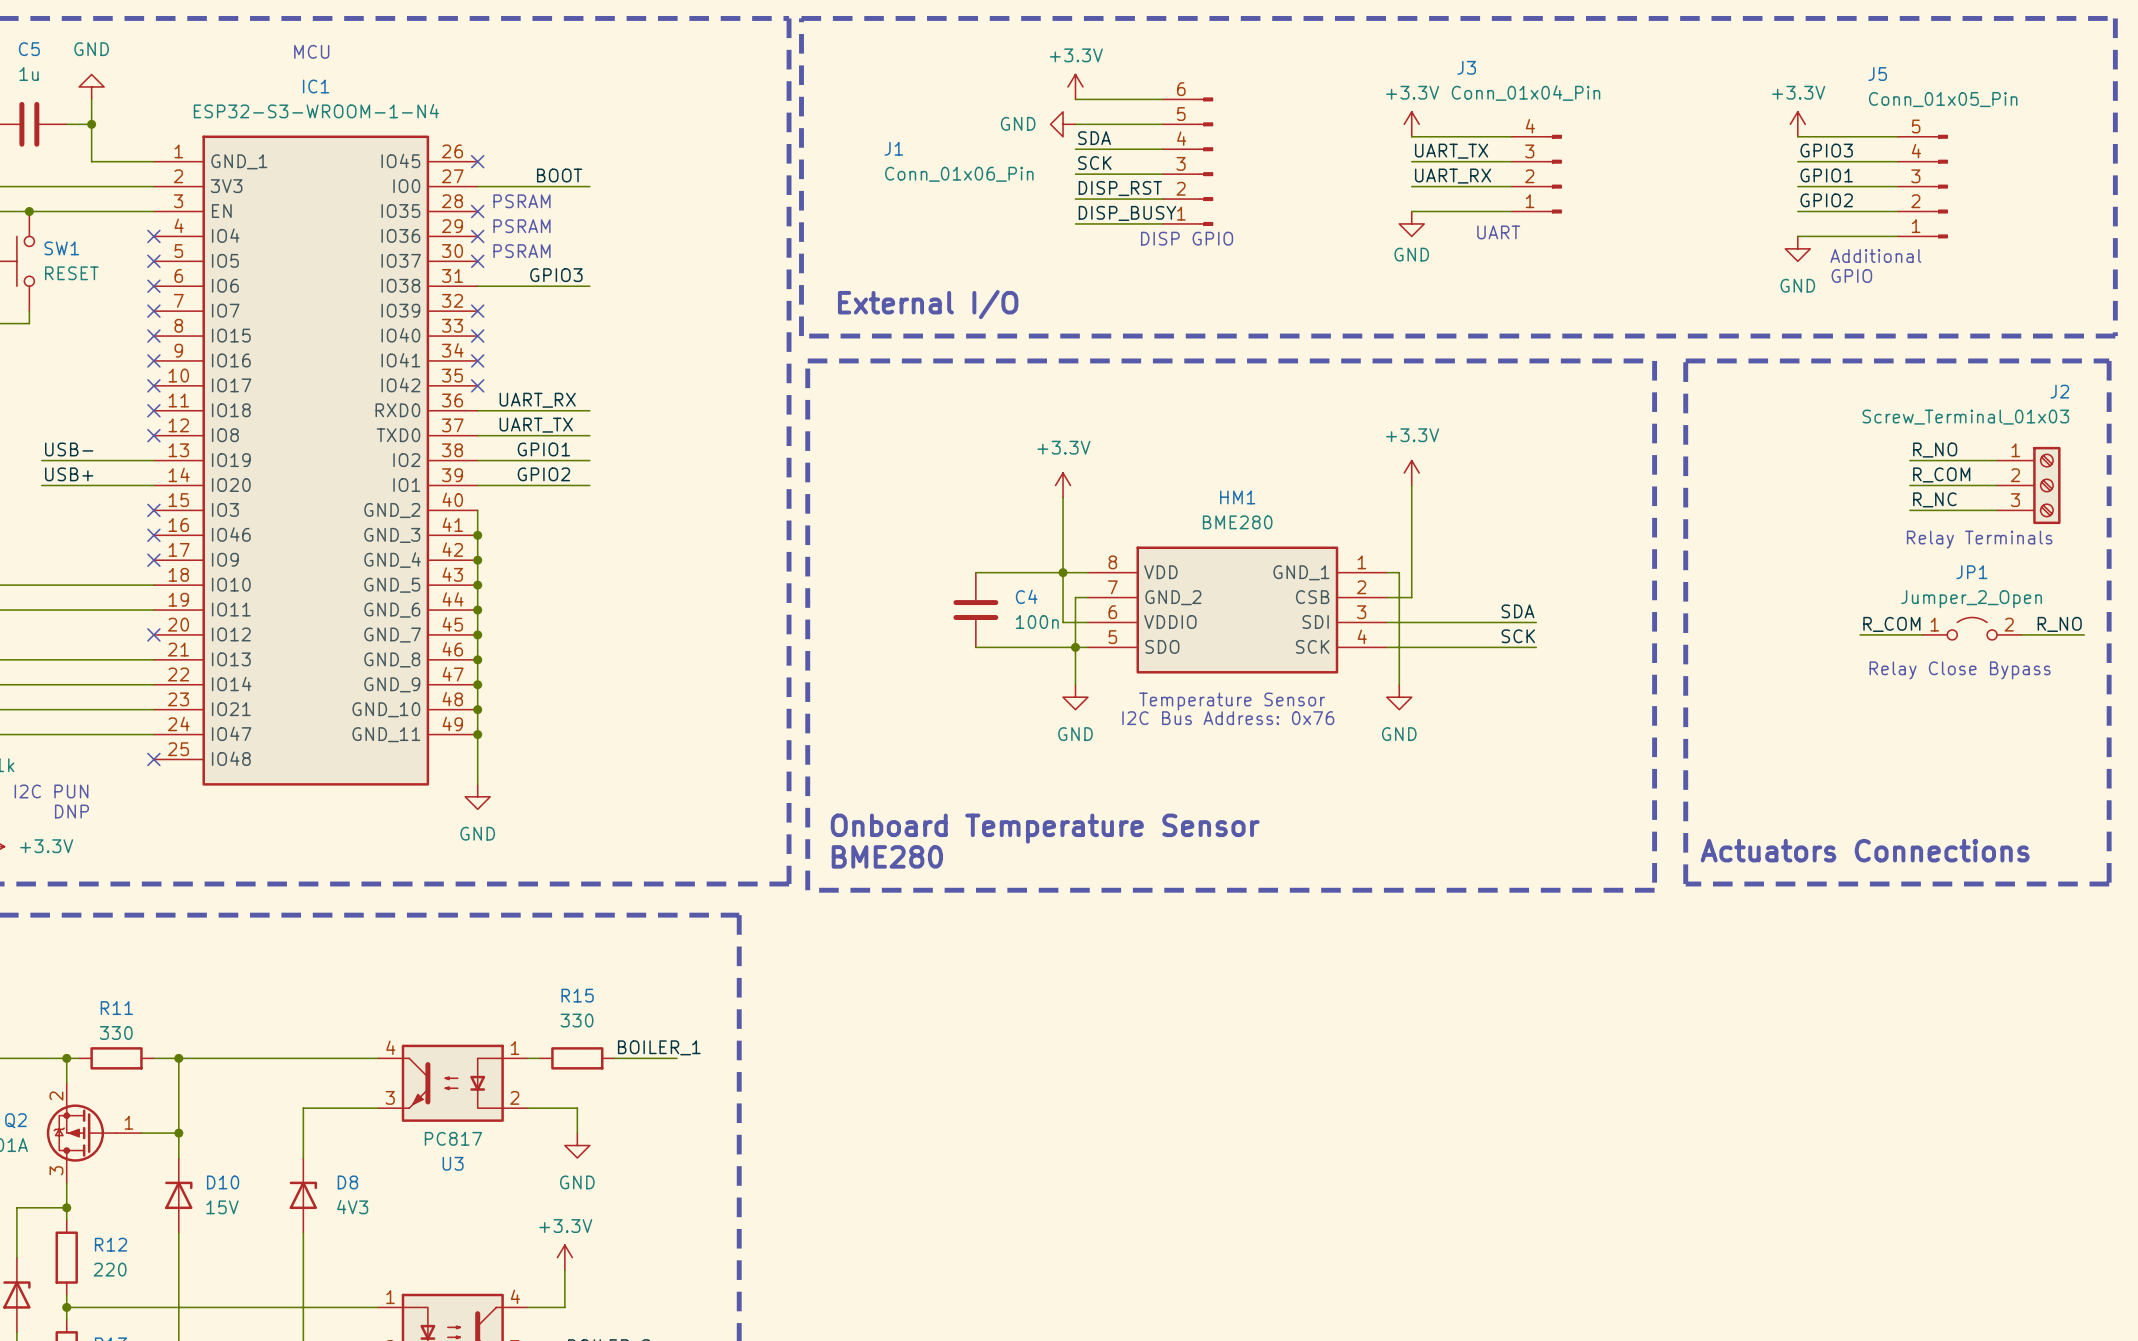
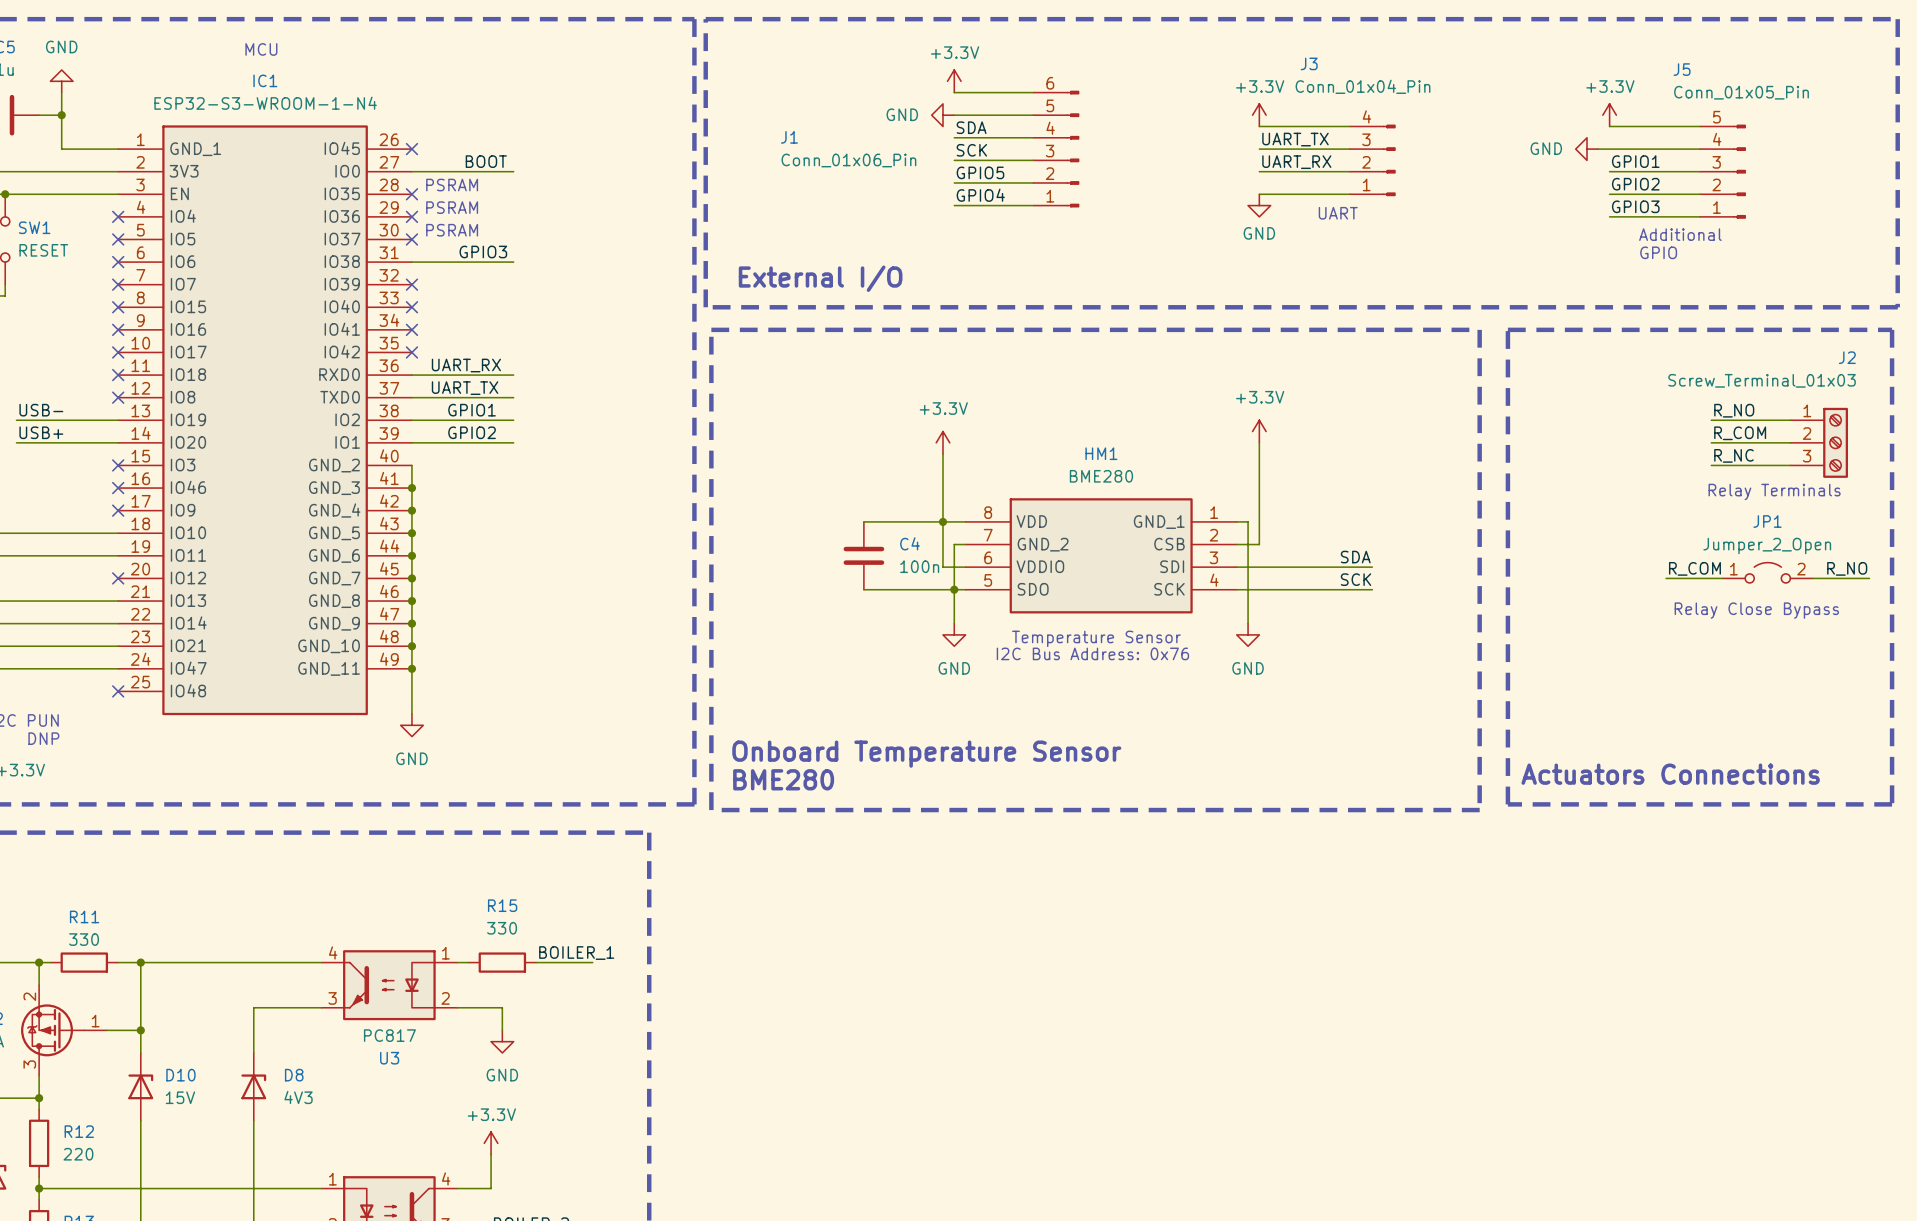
label position: GPIO3 (1826, 150) -> GPIO3 (1635, 206)
wire: none -> (1598, 149) (1609, 149)
label: DISP_RST (1120, 188) -> GPIO5 (980, 172)
label: DISP_BUSY (1127, 213) -> GPIO4 (980, 195)
text: DISP GPIO (1187, 238) -> none
power symbol rotation: 0° (1797, 248) -> 90° clockwise (1587, 149)
power symbol position: GND (1797, 248) -> GND (1587, 149)

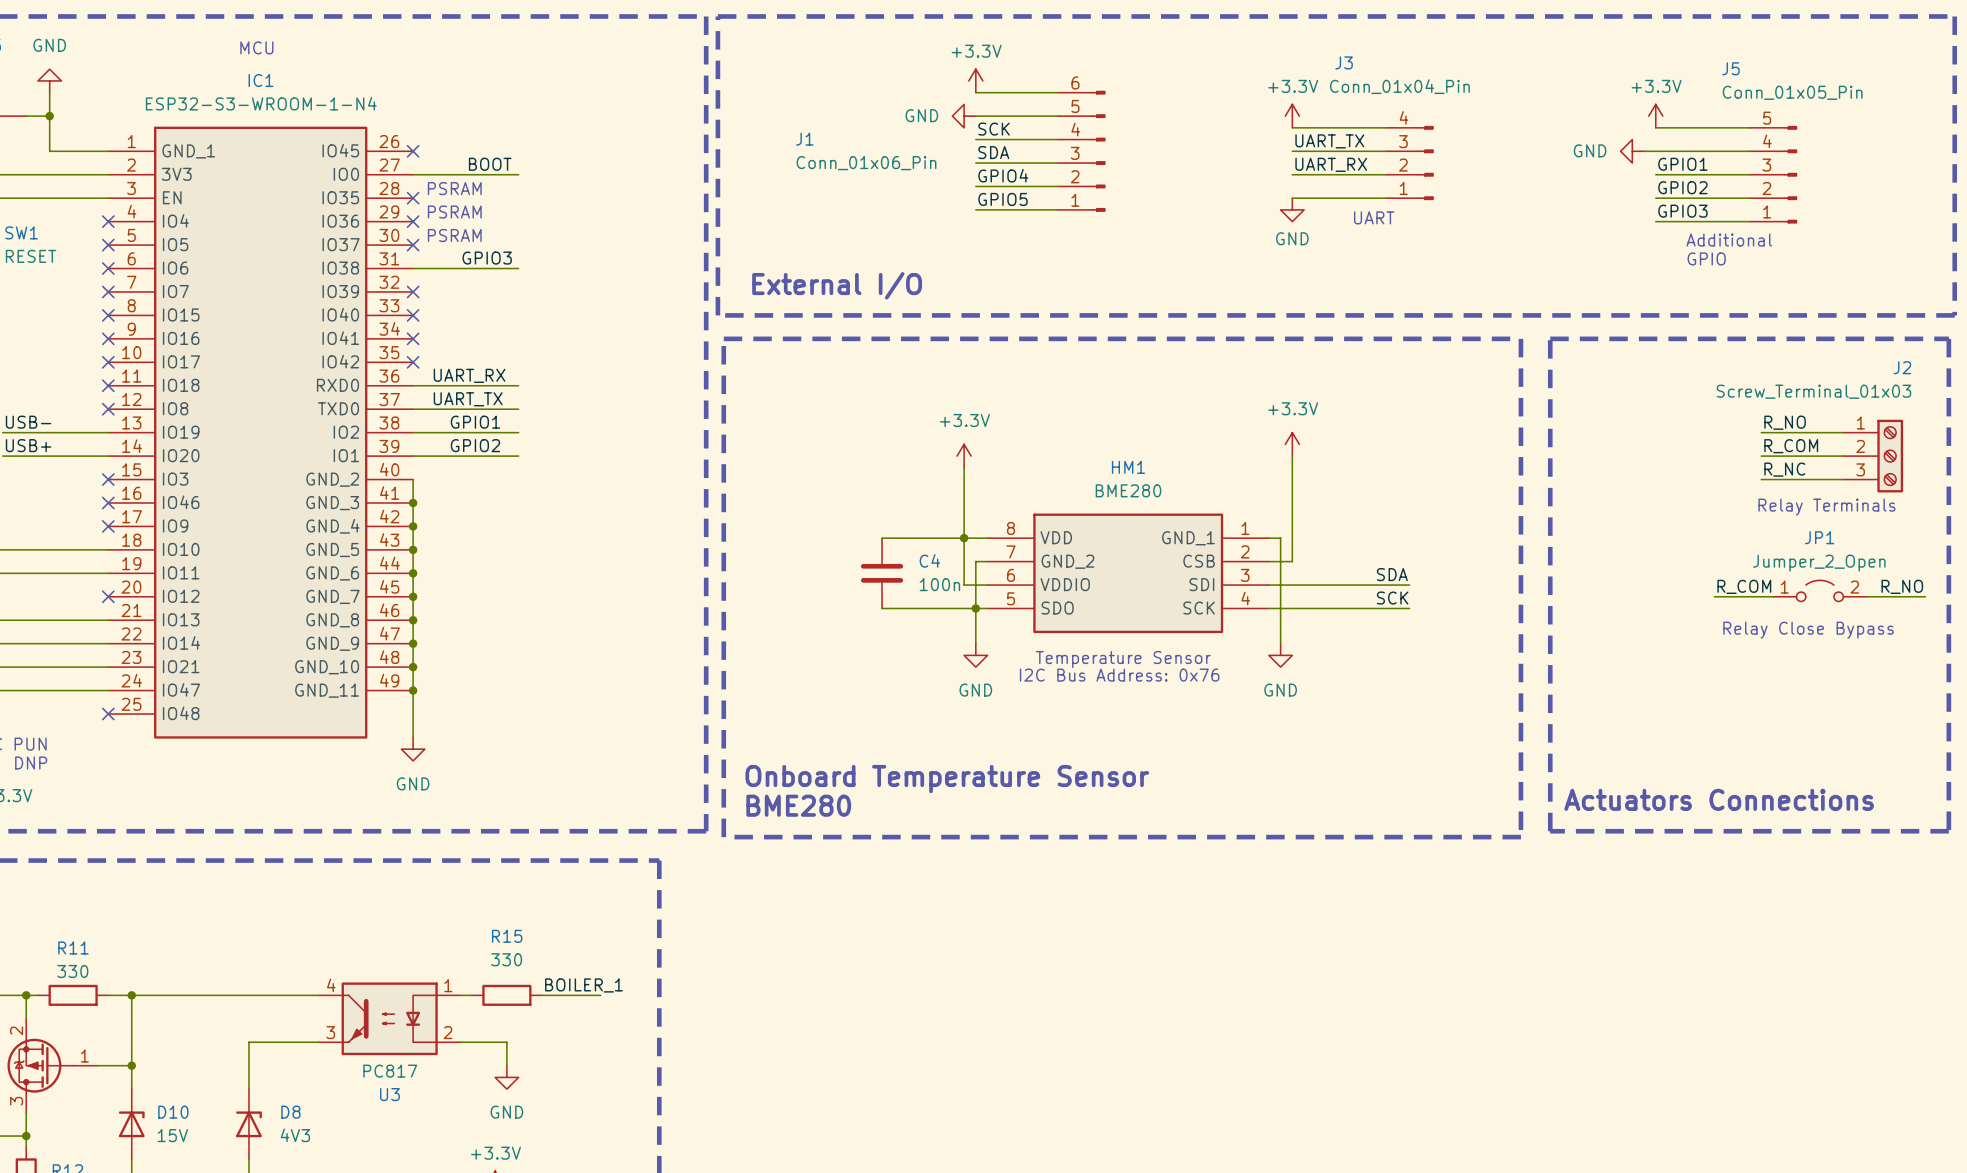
label: SDA (971, 127) -> SCK (994, 129)
label: SCK (971, 150) -> SDA (993, 152)
label: GPIO5 (980, 172) -> GPIO4 (1003, 175)
label: GPIO4 (980, 195) -> GPIO5 (1002, 199)

